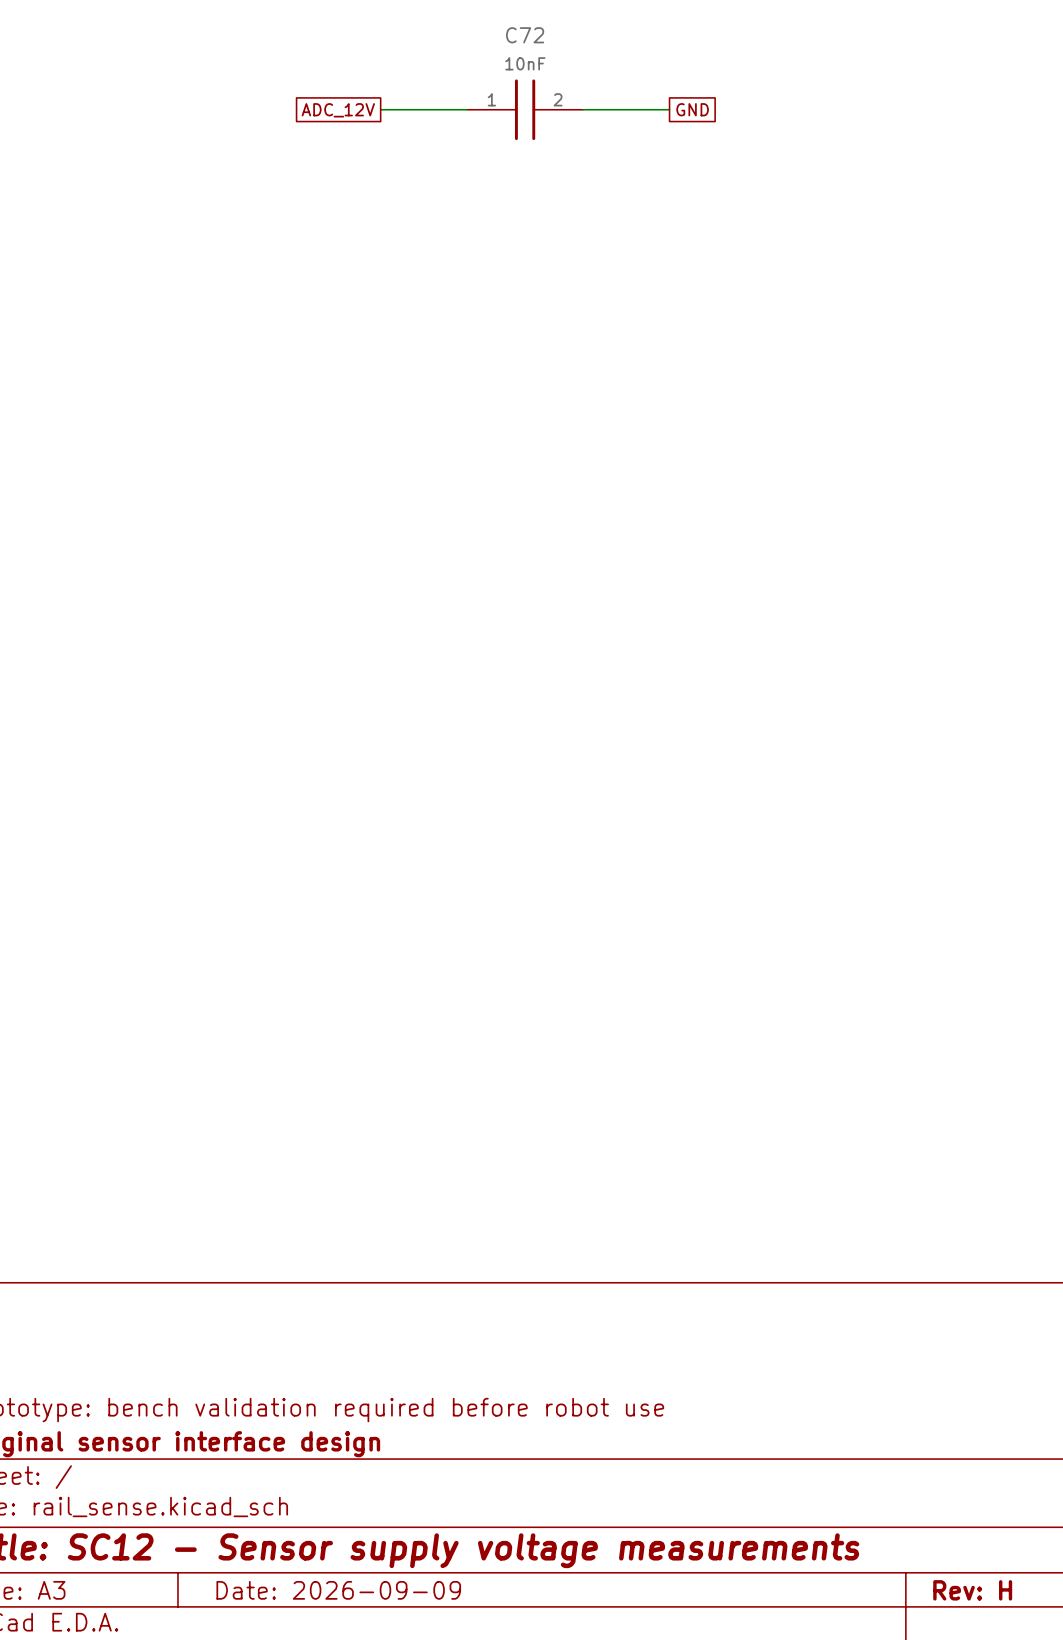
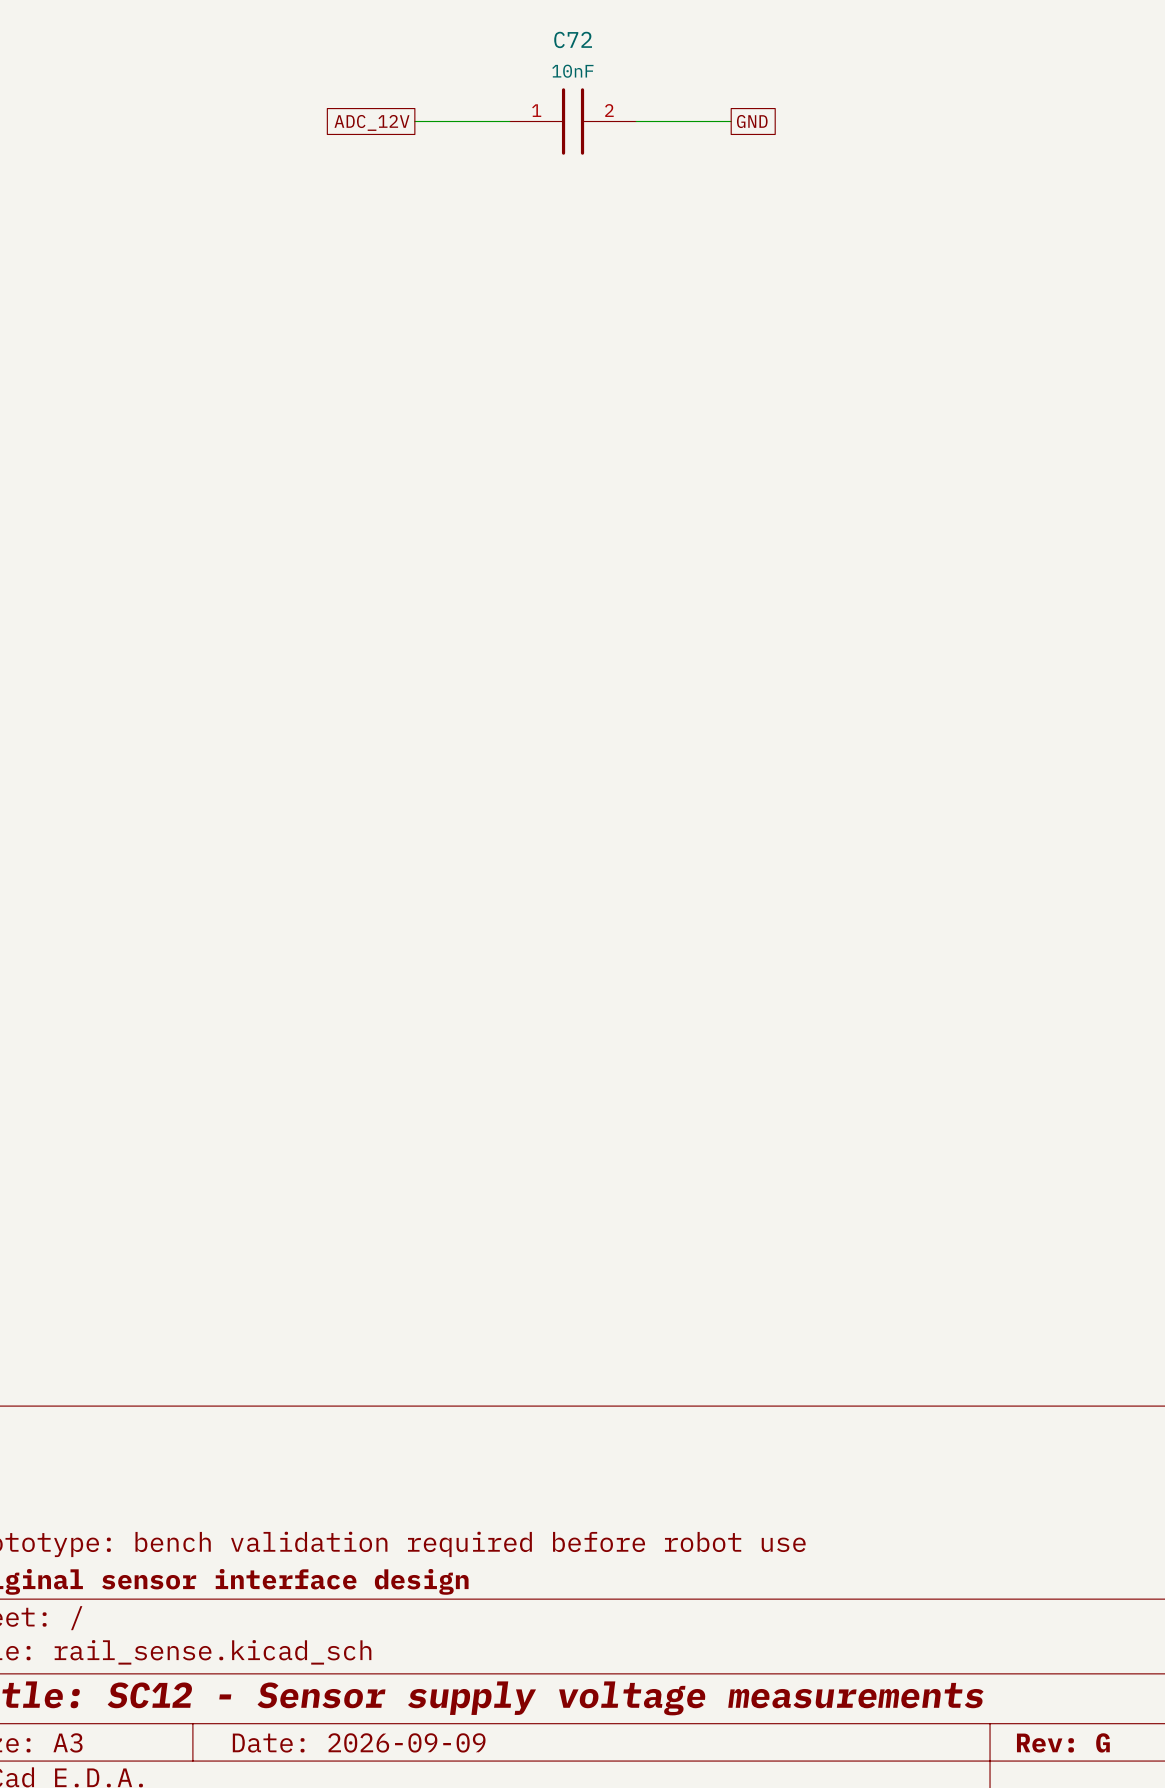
title block: Rev: H (972, 1590) -> Rev: G (1063, 1742)

